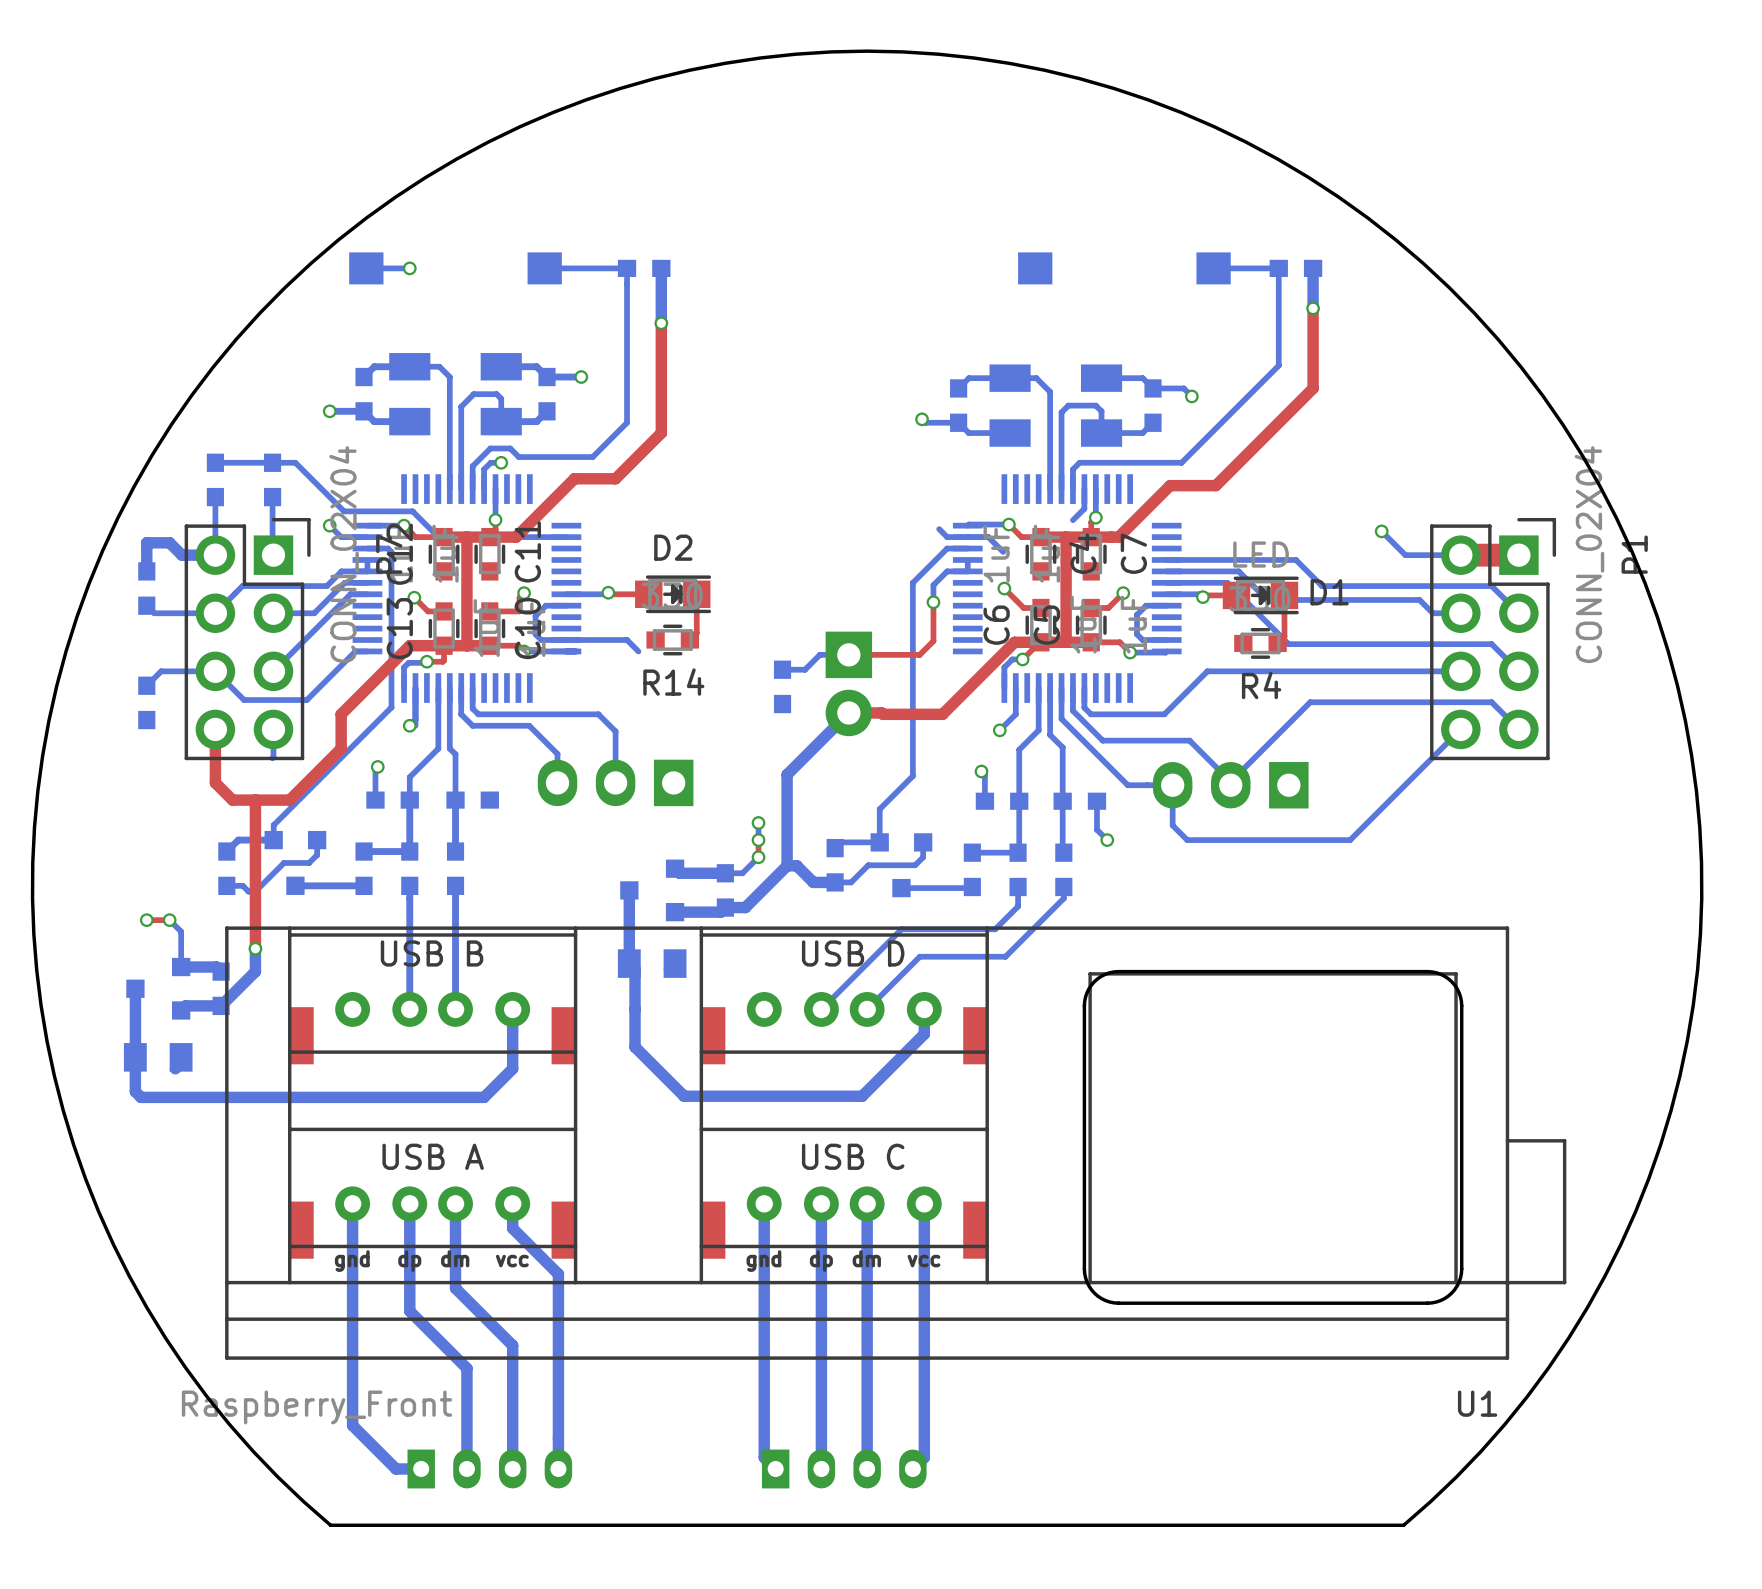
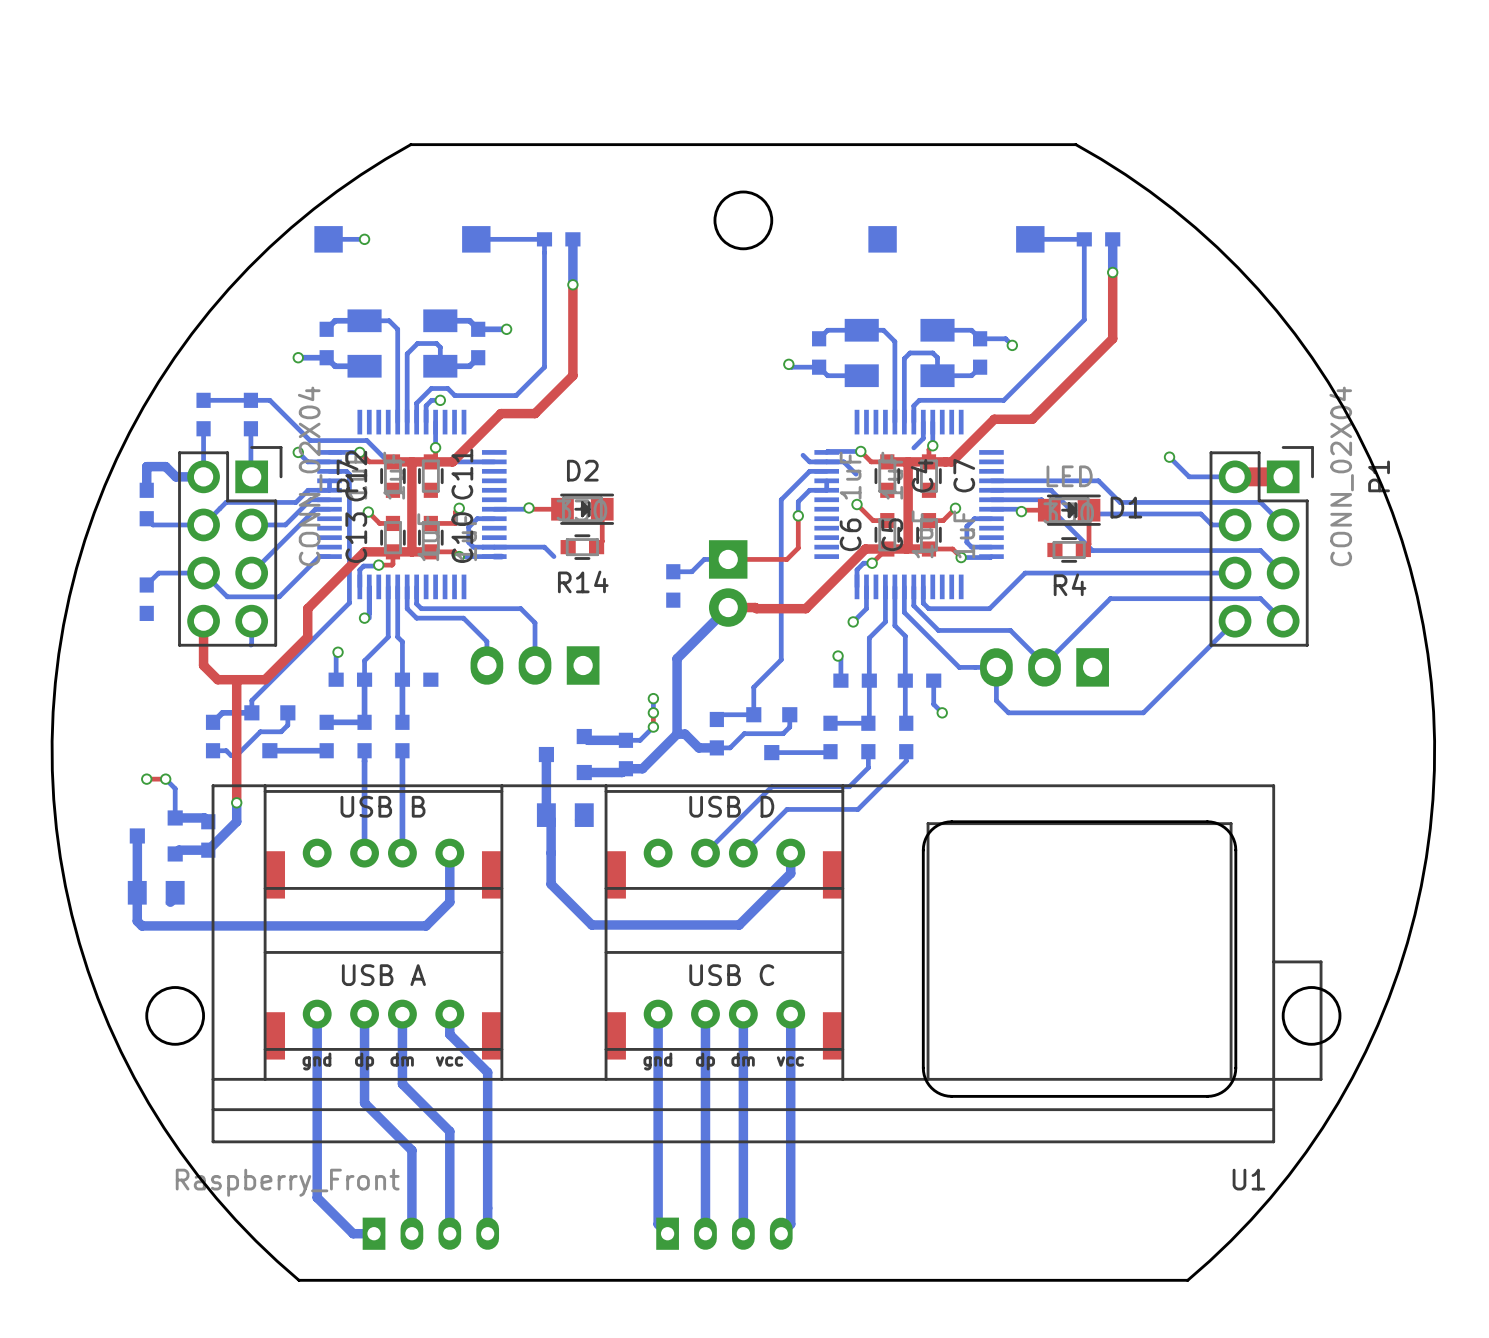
round board edge: none -> [713, 190, 774, 251]
round board edge: none -> [145, 986, 205, 1046]
round board edge: none -> [1281, 986, 1342, 1046]
board edge: (330, 1525) (277, 1476) (229, 1424) (206, 1396) (165, 1338) (129, 1276) (98, 1211) (73, 1144) (63, 1110) (46, 1040) (41, 1005) (33, 934) (32, 862) (37, 791) (48, 720) (66, 651) (76, 617) (102, 550) (134, 486) (171, 425) (213, 367) (260, 313) (311, 263) (338, 239) (395, 197) (456, 159) (520, 126) (553, 112) (620, 88) (689, 70) (760, 58) (831, 51) (867, 51) (938, 54) (974, 58) (1044, 70) (1113, 88) (1181, 112) (1246, 142) (1308, 177) (1338, 197) (1395, 239) (1449, 287) (1498, 339) (1521, 367) (1563, 425) (1600, 486) (1631, 550) (1645, 583) (1668, 651) (1685, 720) (1696, 791) (1701, 862) (1700, 934) (1697, 970) (1687, 1040) (1671, 1110) (1648, 1178) (1620, 1244) (1587, 1307) (1568, 1338) (1527, 1396) (1504, 1424) (1456, 1476) (1403, 1525) -> (298, 1280) (235, 1219) (180, 1152) (134, 1077) (97, 998) (71, 914) (60, 857) (52, 770) (55, 682) (69, 596) (94, 512) (129, 432) (158, 382) (209, 311) (269, 247) (336, 191) (410, 144) (1075, 144) (1149, 191) (1217, 247) (1257, 289) (1312, 357) (1343, 407) (1370, 458) (1392, 512) (1410, 568) (1427, 654) (1433, 712) (1434, 770) (1430, 828) (1414, 914) (1398, 970) (1377, 1025) (1352, 1077) (1306, 1152) (1270, 1198) (1230, 1240) (1187, 1280)

